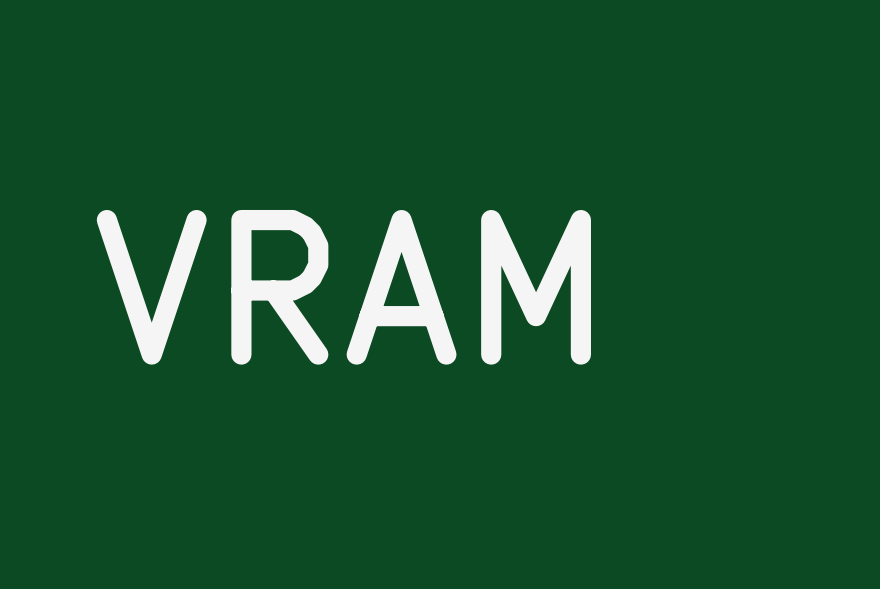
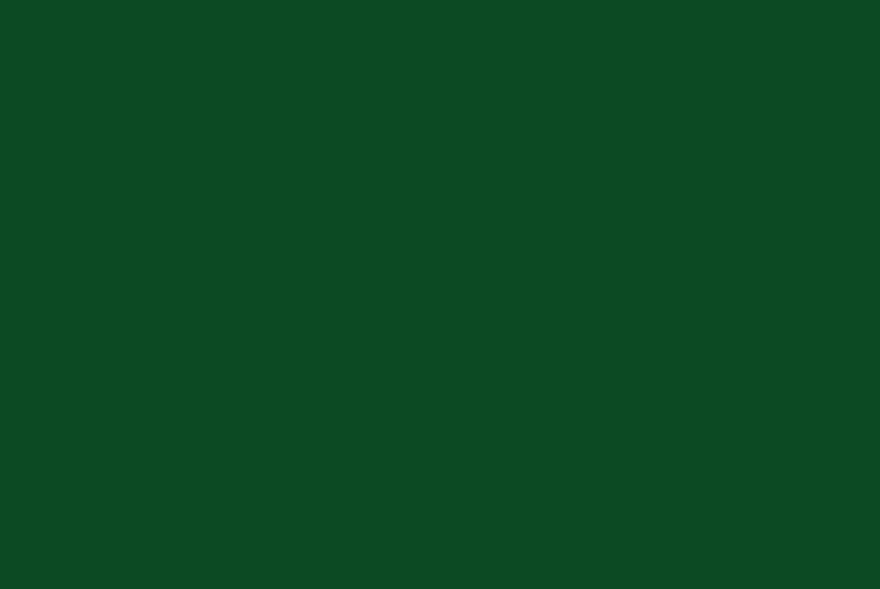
text: VRAM (343, 287) -> none

